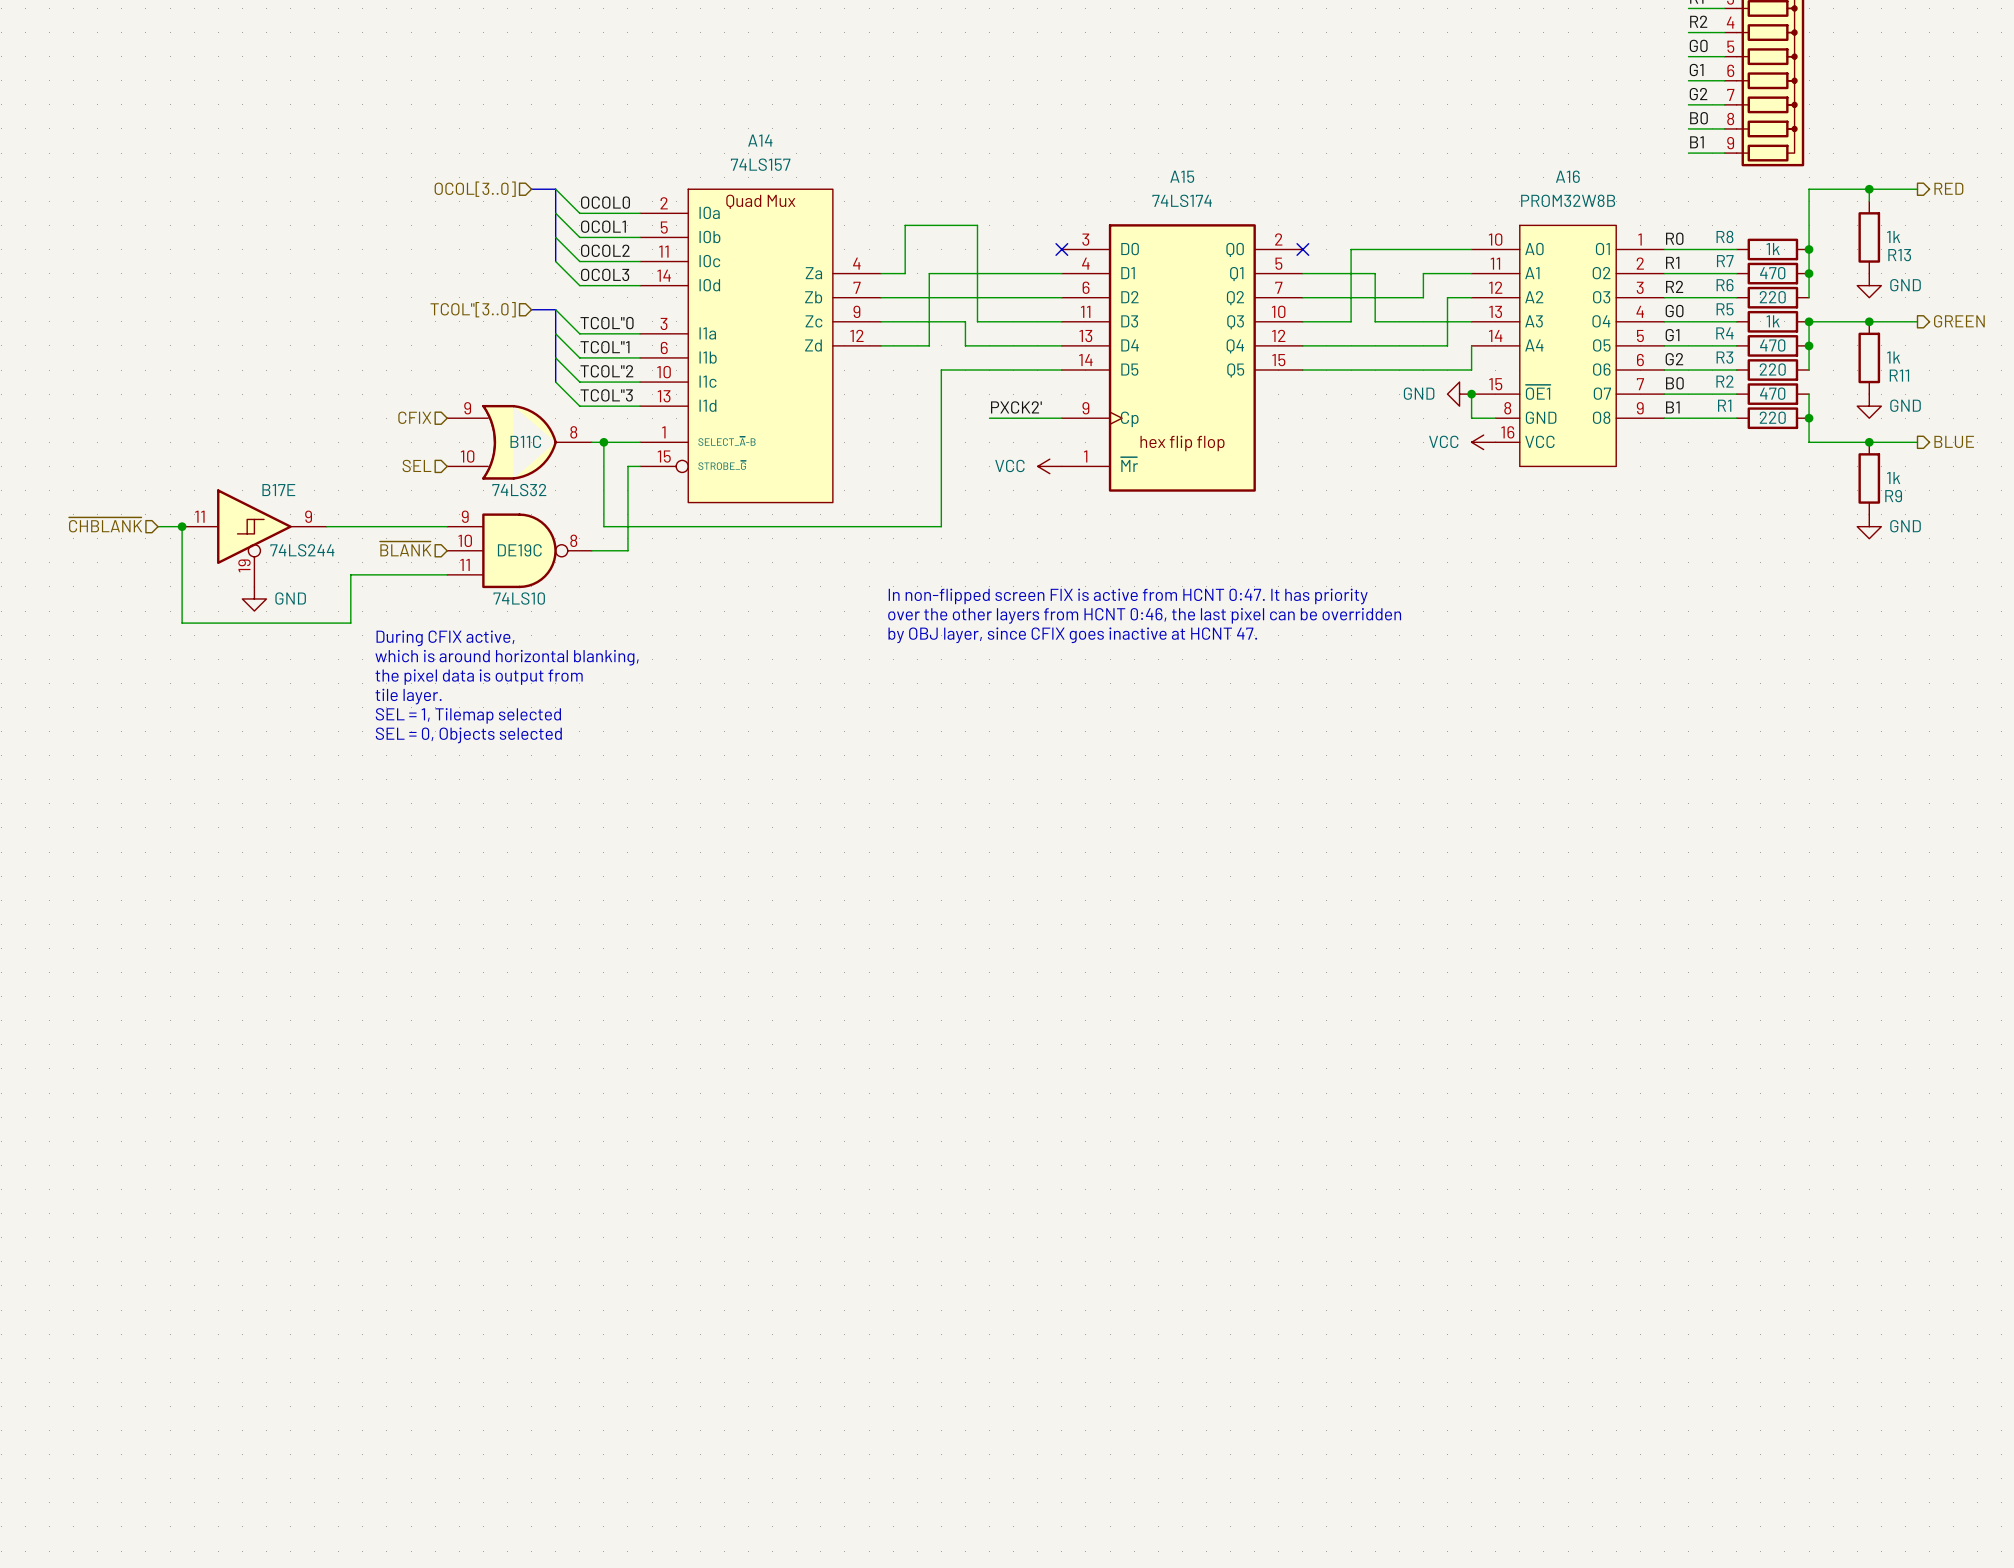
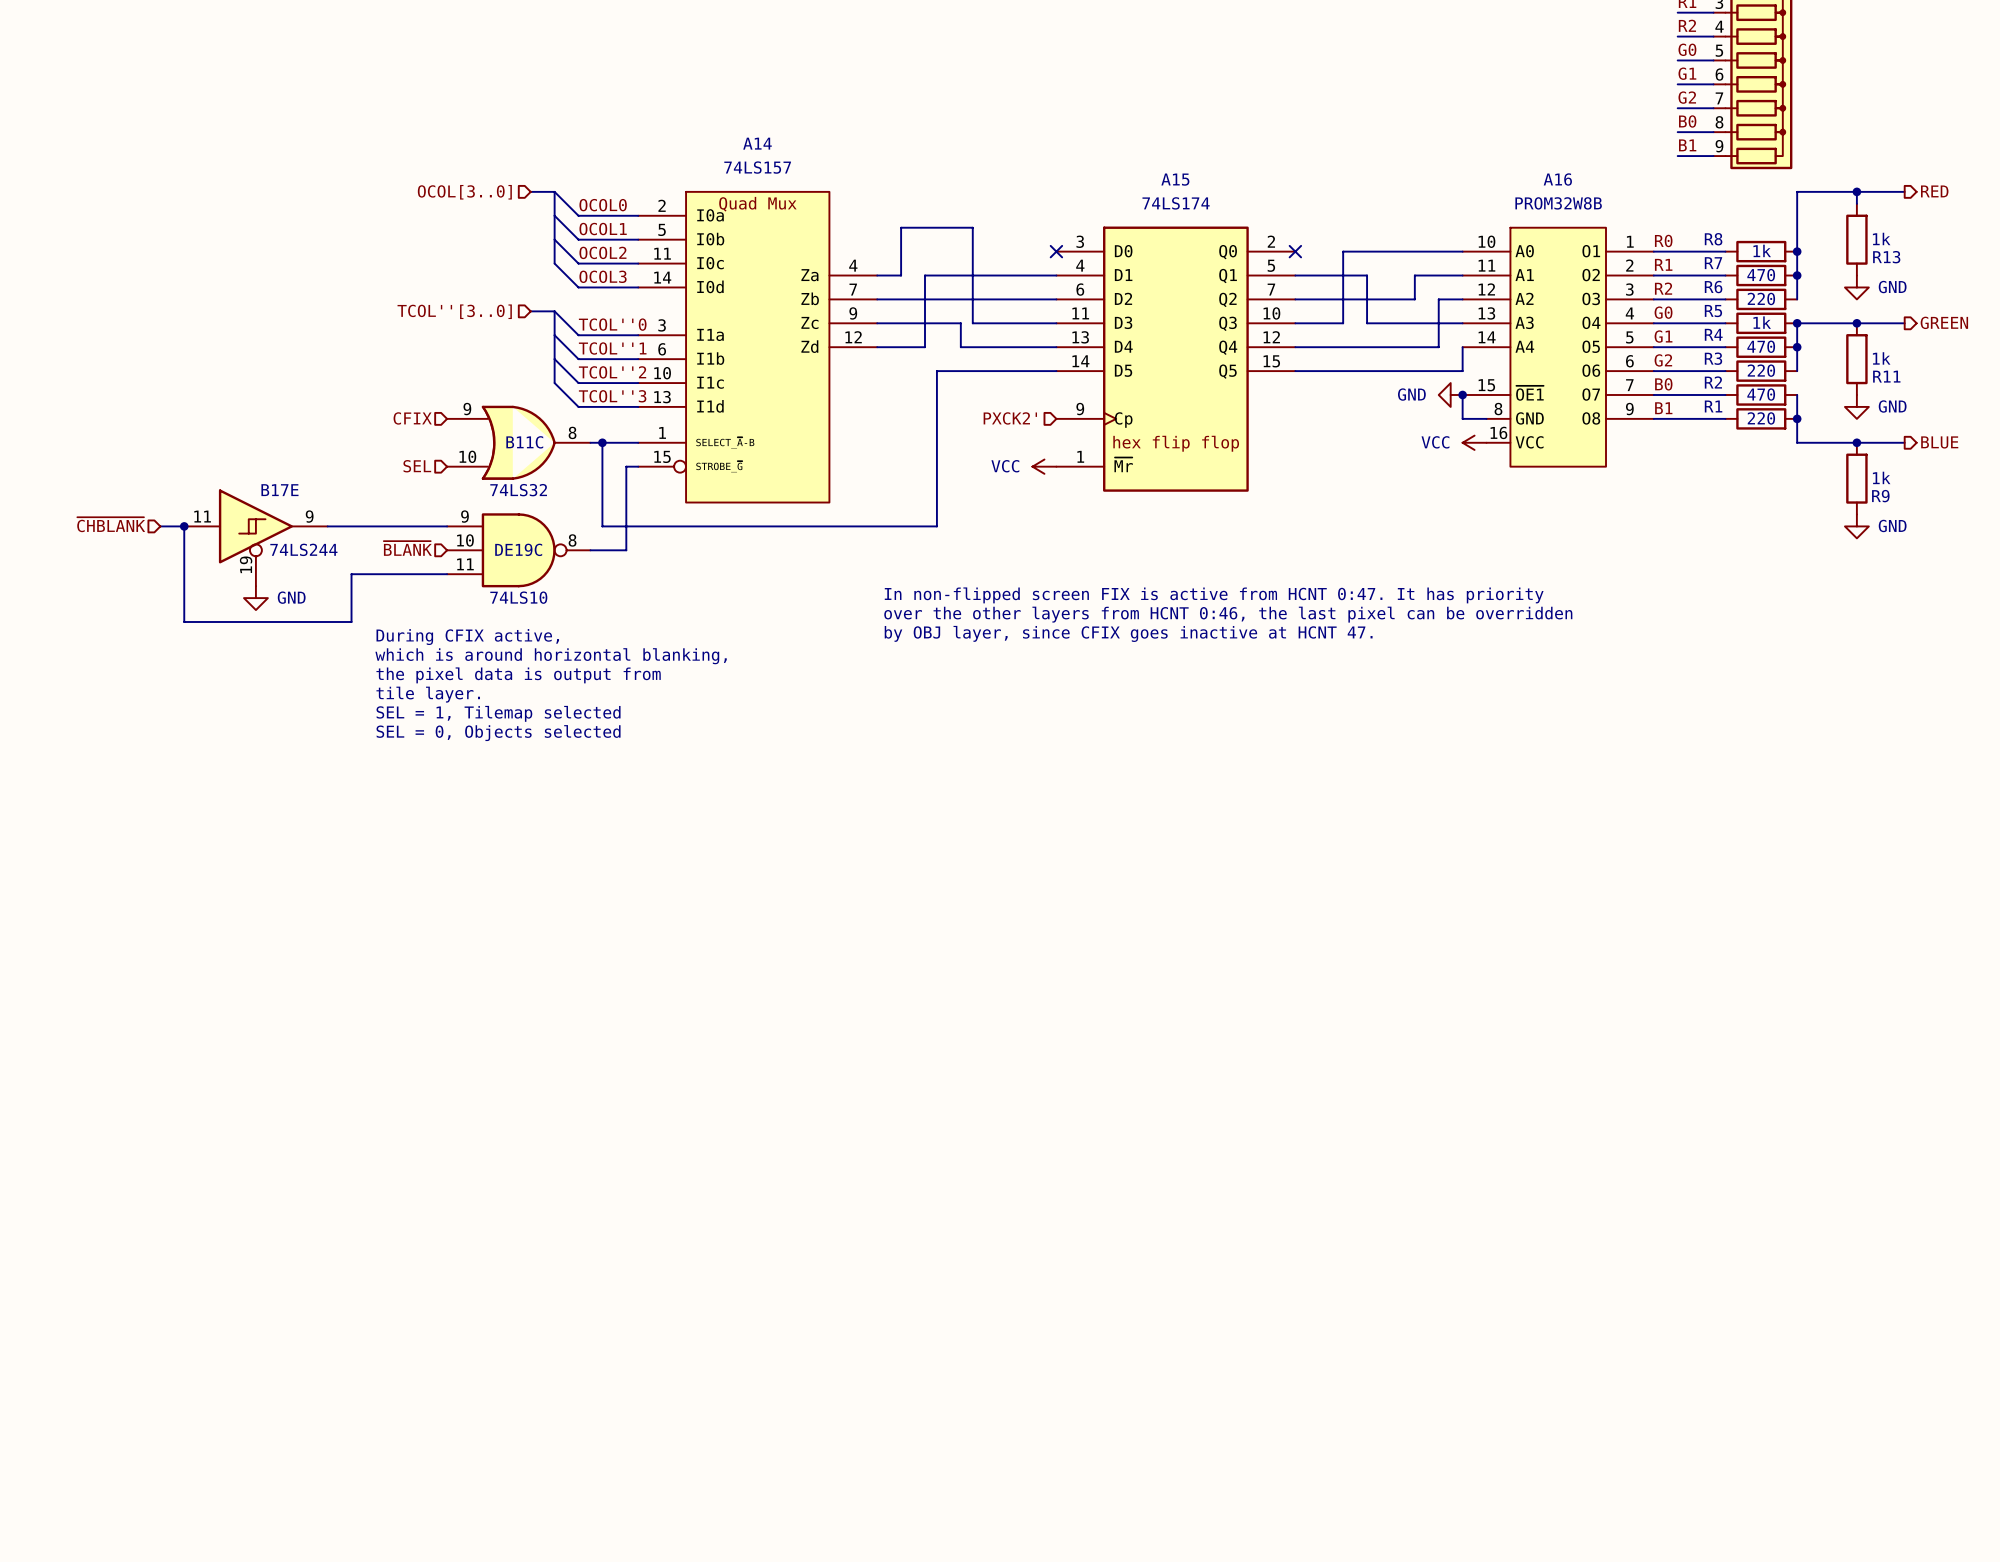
label: PXCK2' (1016, 407) -> none
hierarchical label: none -> PXCK2' (1010, 418)
wire: (989, 418) (1061, 418) -> none

